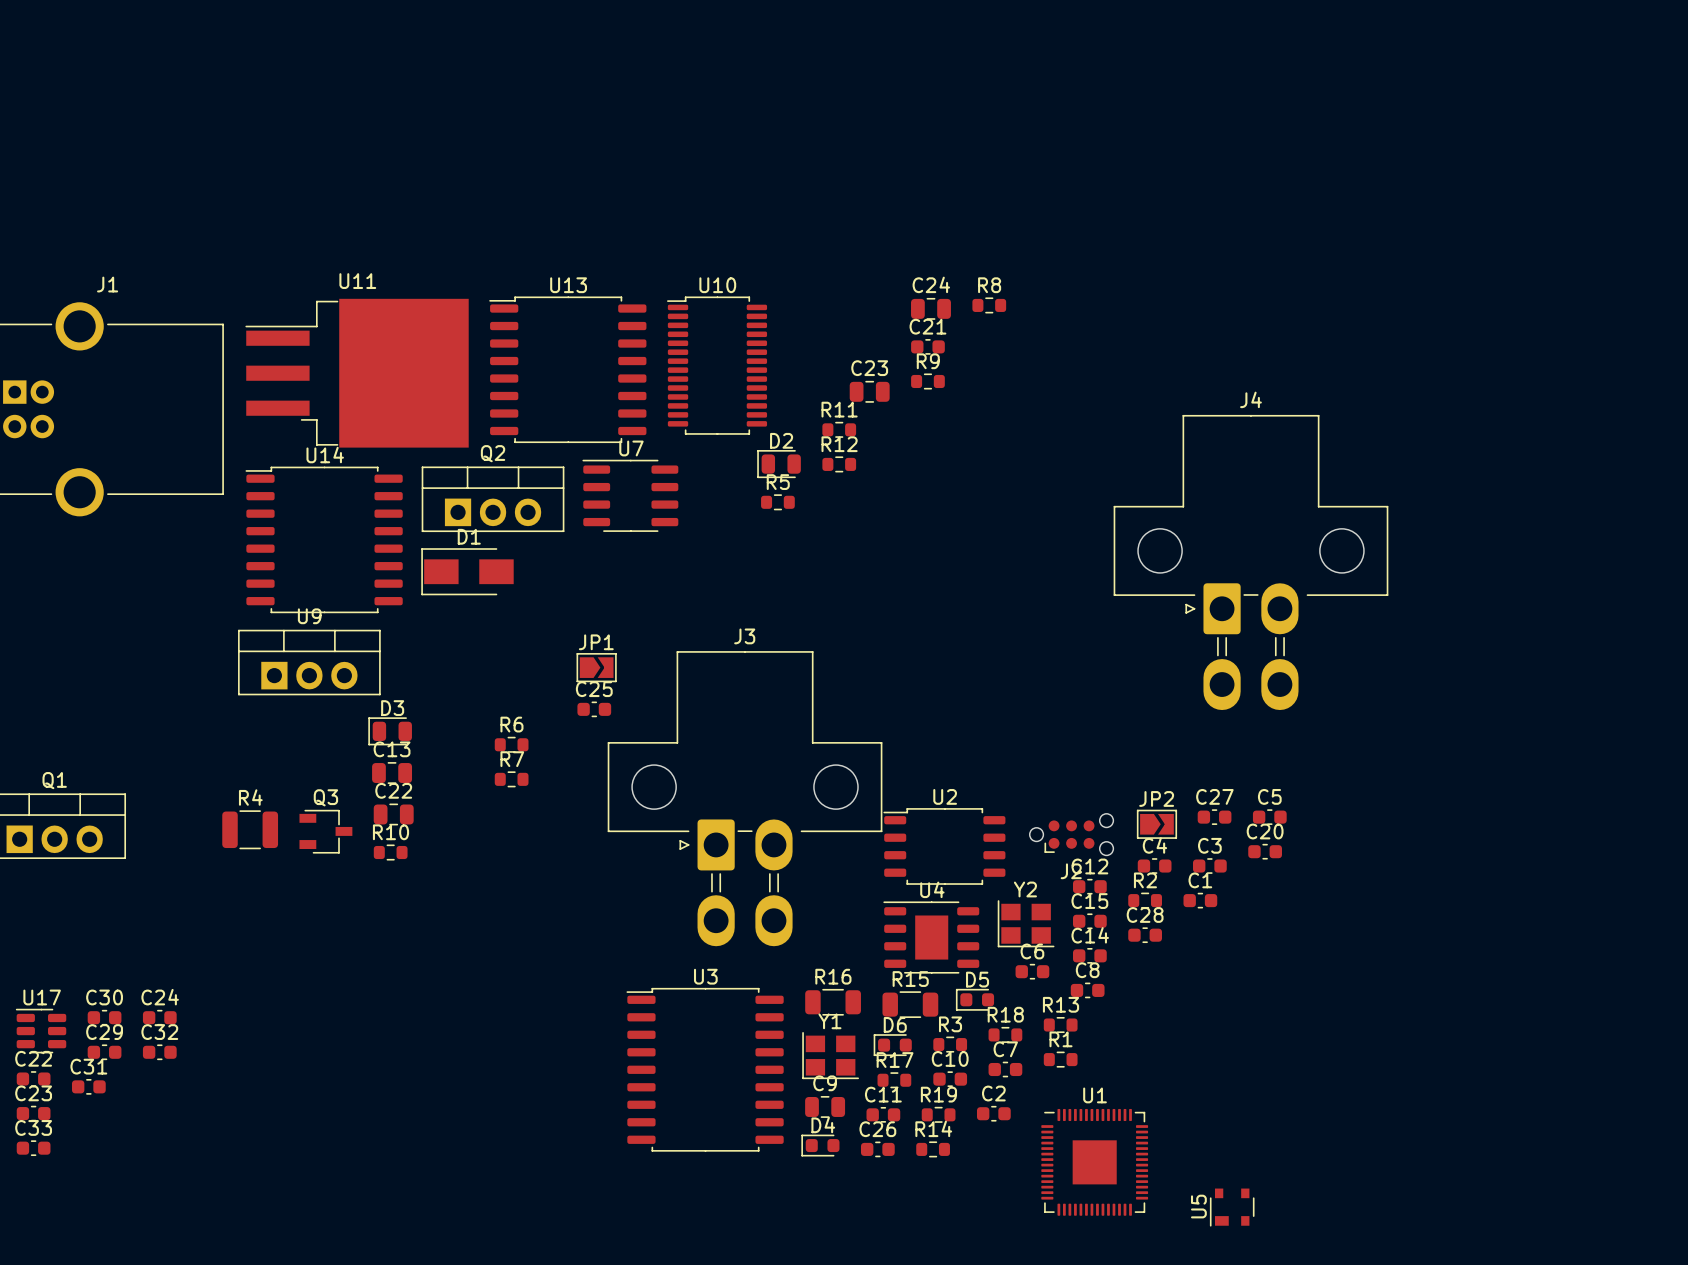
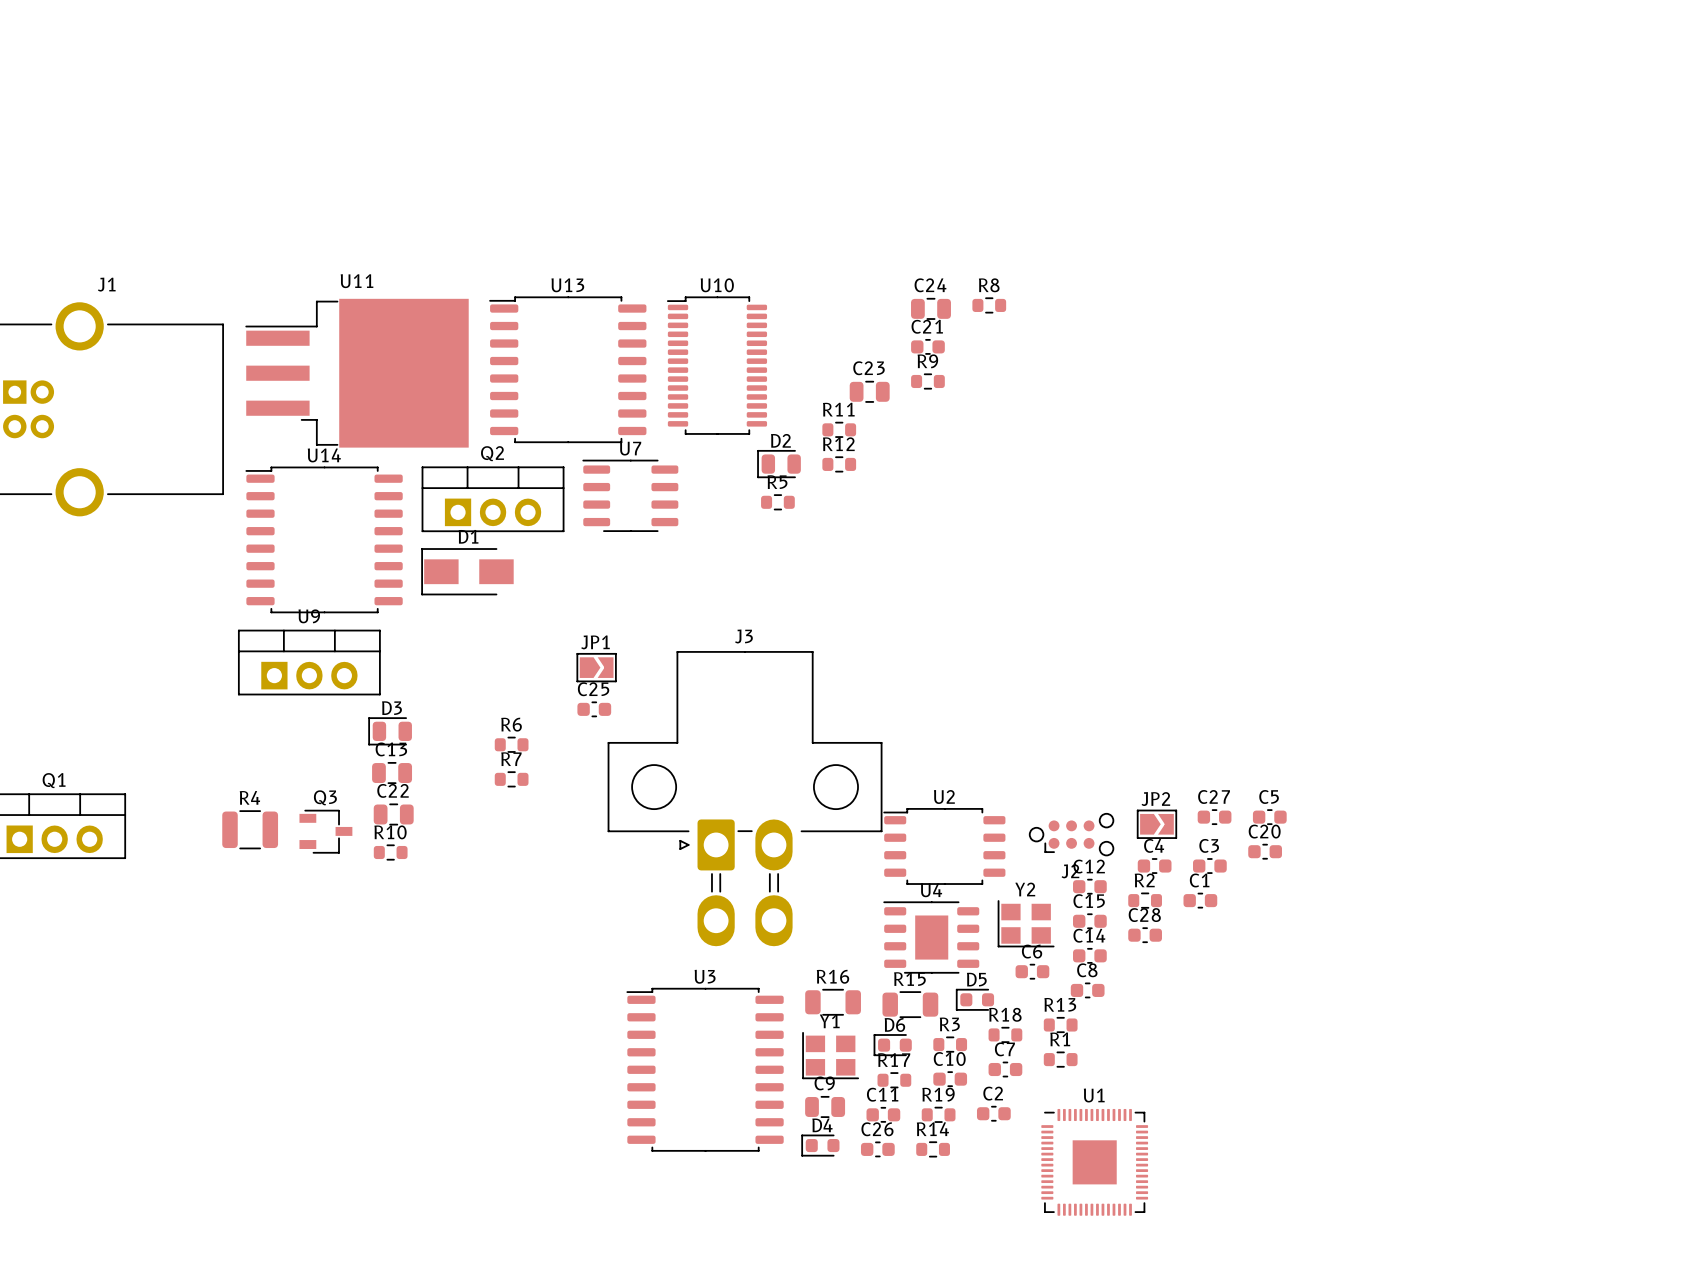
J4: (1250, 562) -> none
C30: (104, 1017) -> none
C24: (159, 1017) -> none
U17: (41, 1031) -> none
C29: (104, 1052) -> none
C32: (159, 1052) -> none
C22: (33, 1079) -> none
C31: (88, 1086) -> none
C23: (33, 1113) -> none
C33: (33, 1148) -> none
U5: (1232, 1207) -> none

